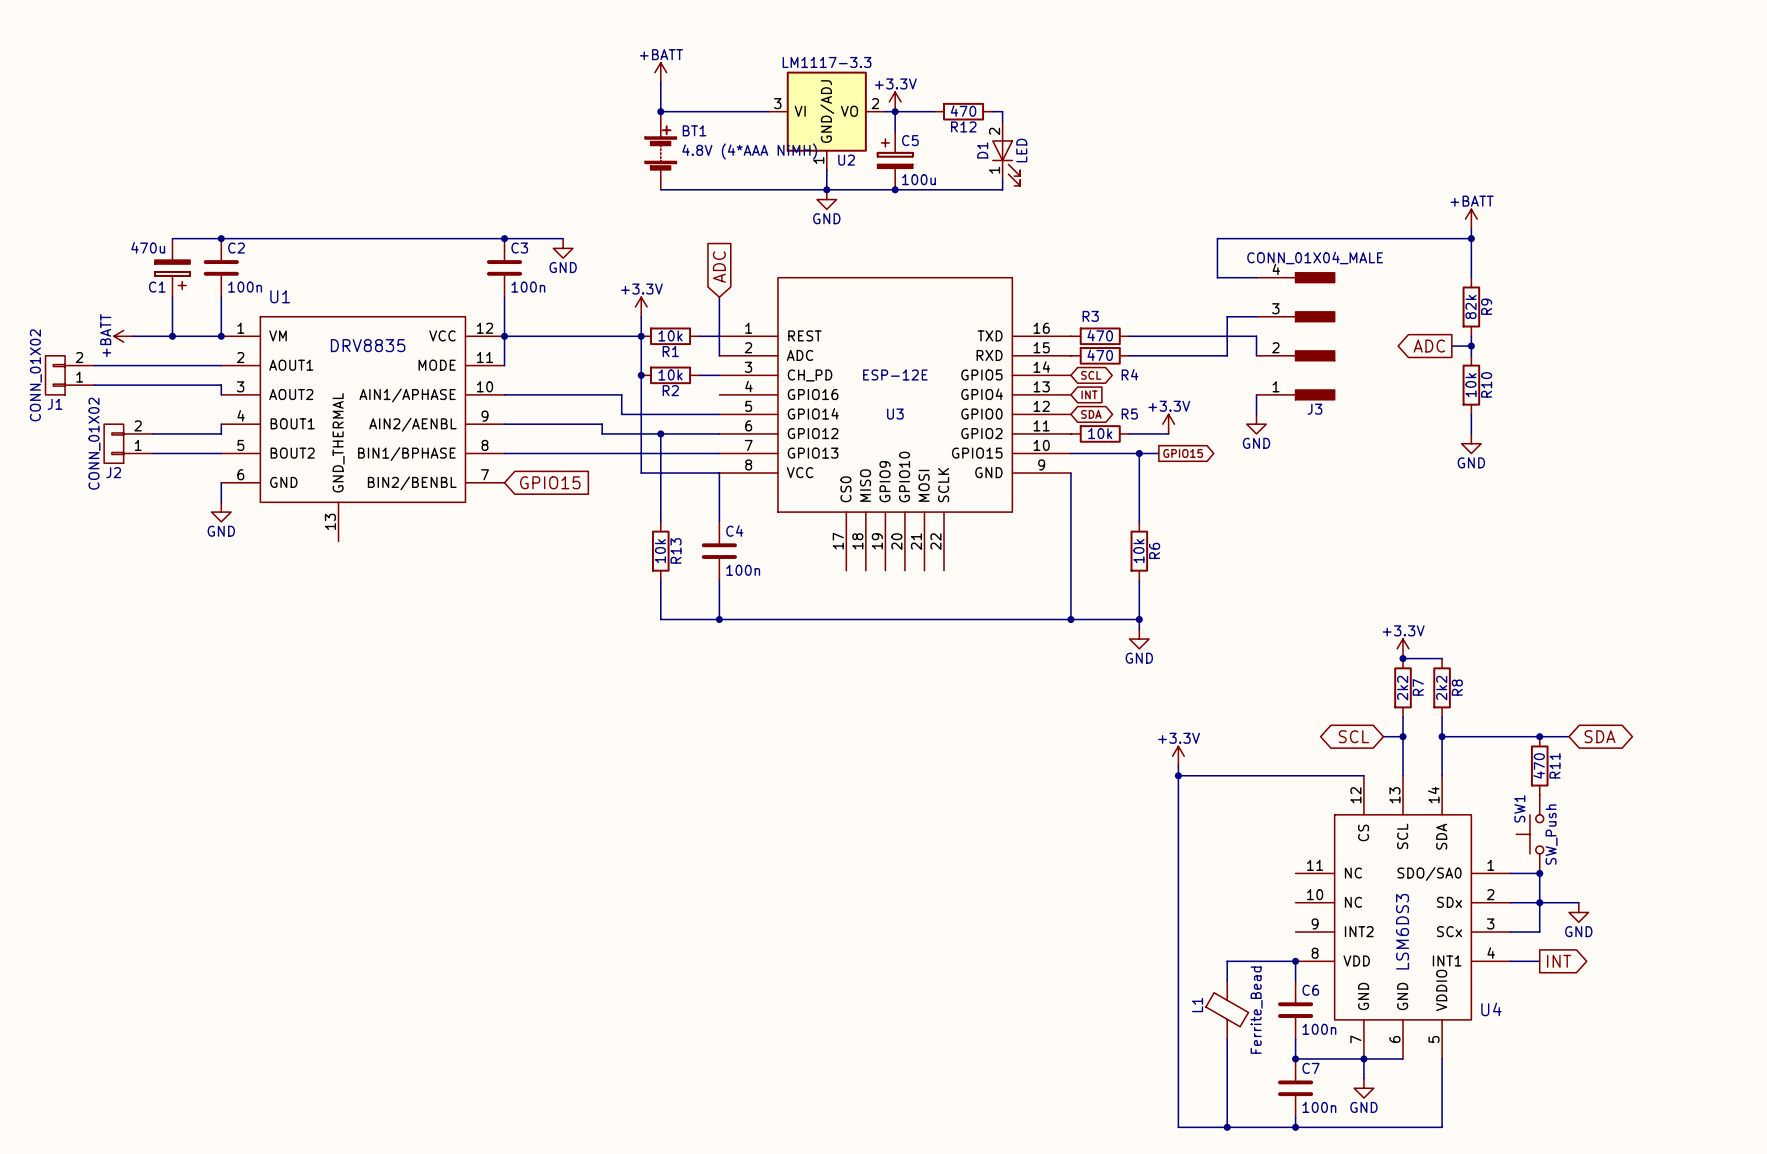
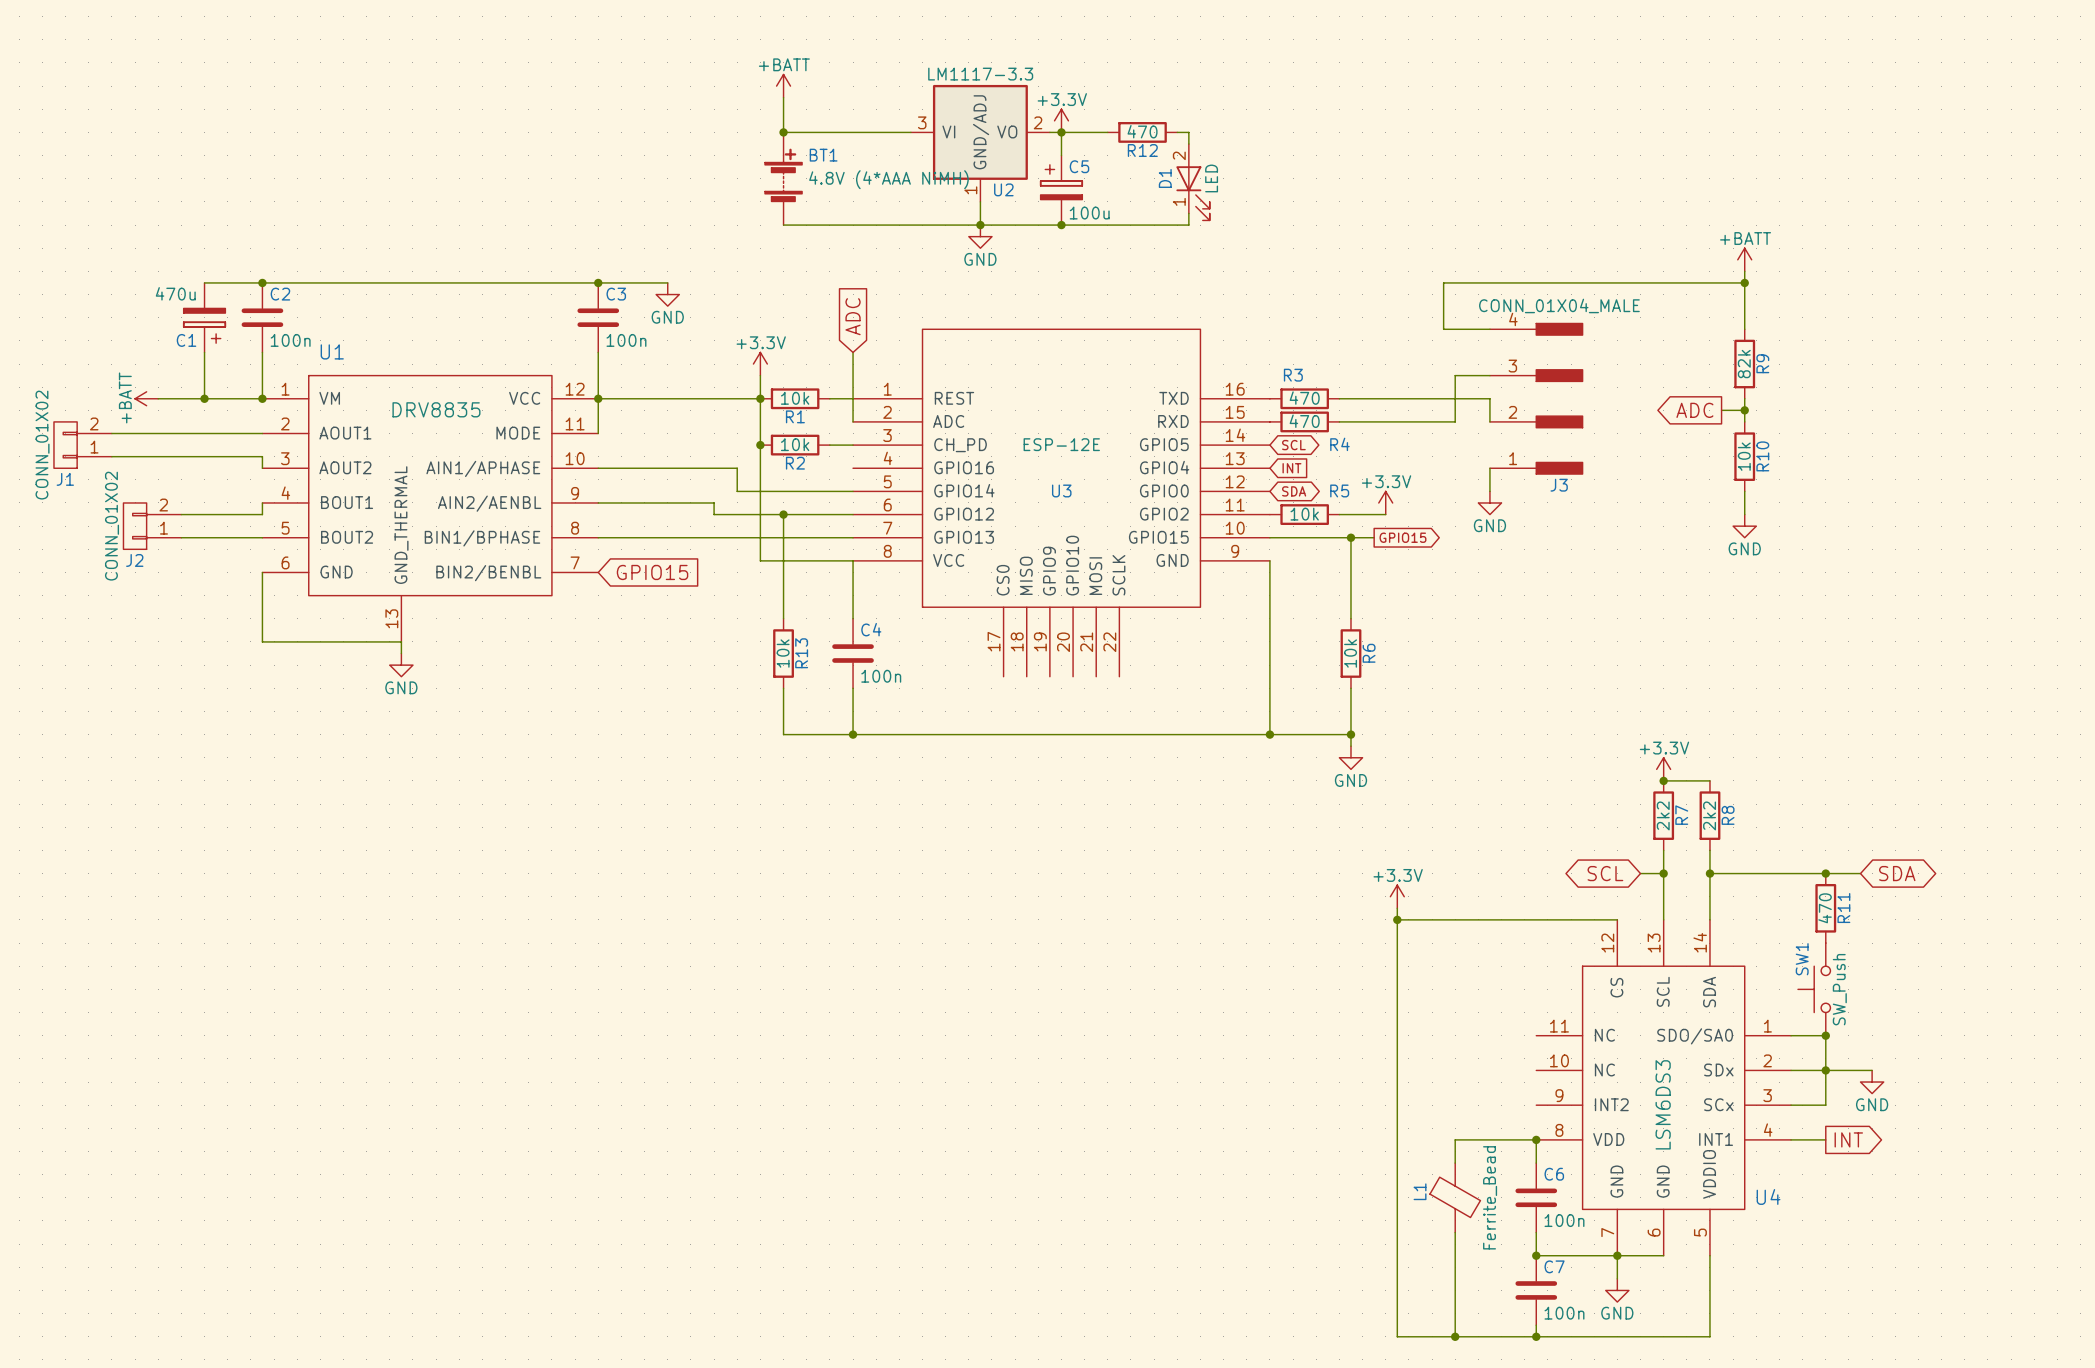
wire: none -> (262, 595) (262, 641) (401, 641) (401, 653)
power symbol position: GND (221, 512) -> GND (401, 665)

